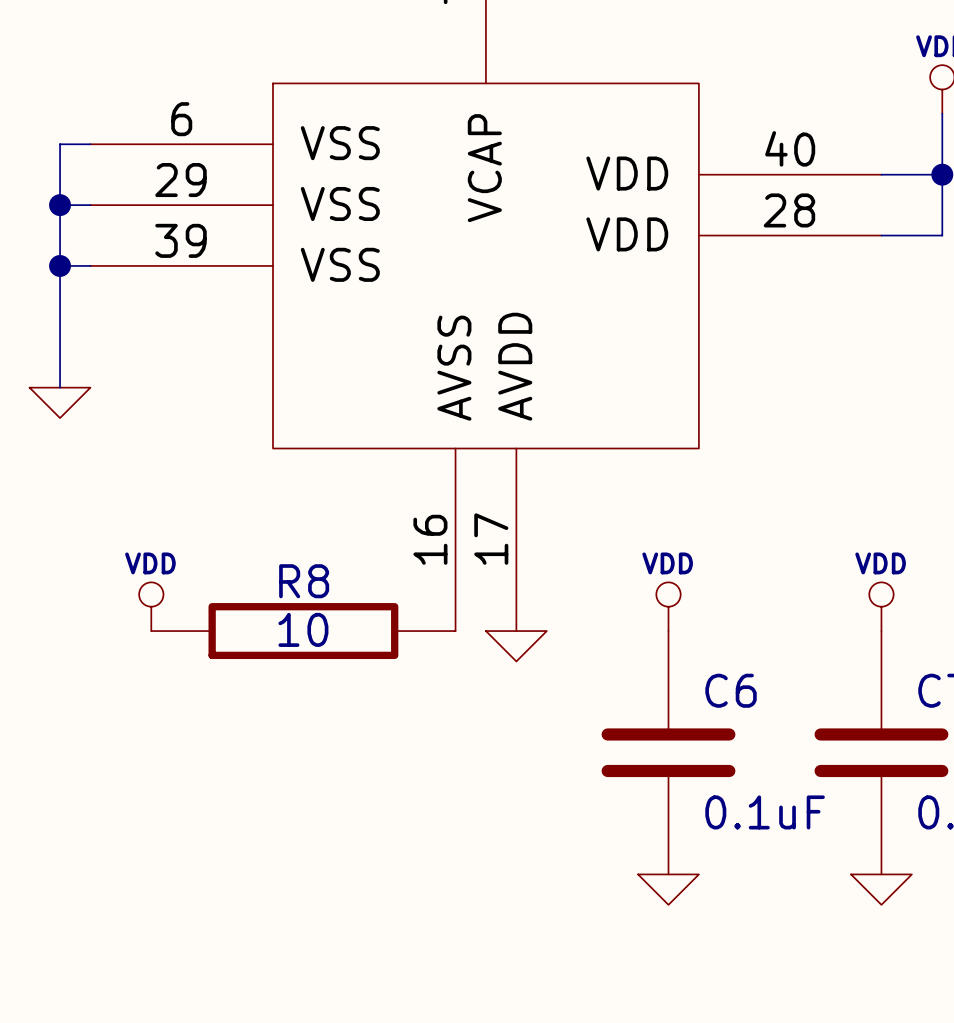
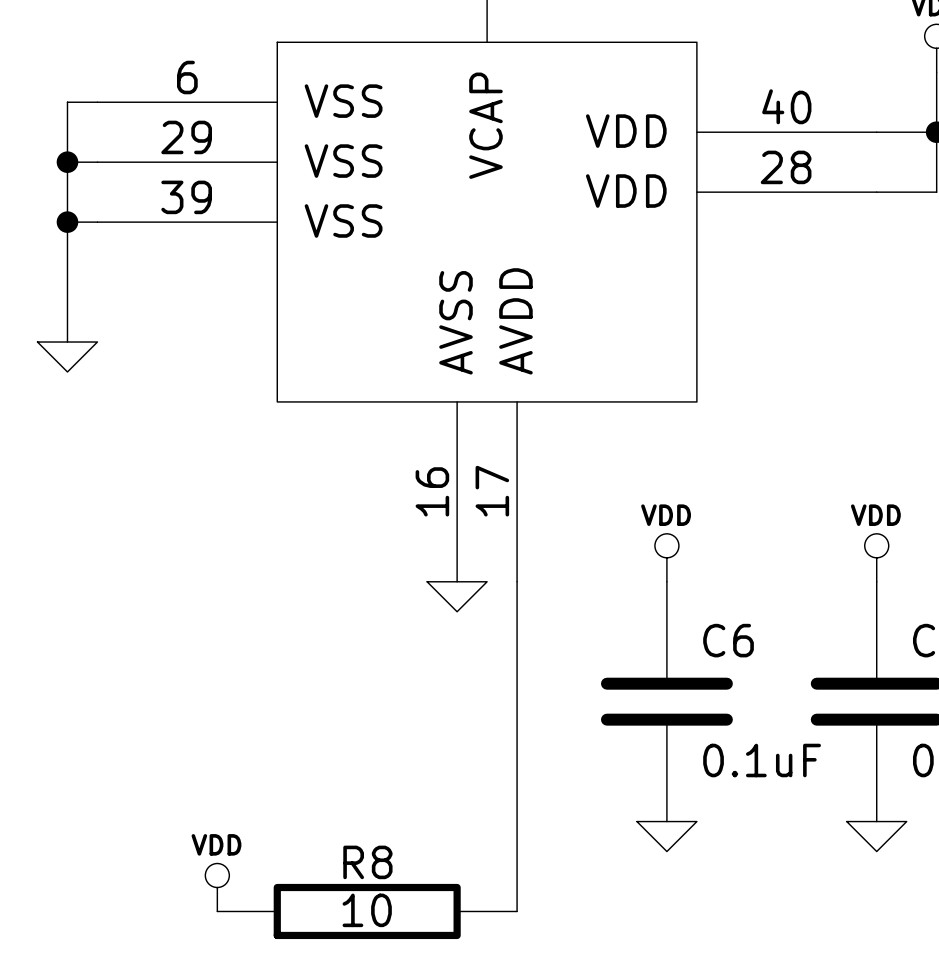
power symbol position: VDD (151, 606) -> VDD (217, 887)
R8 position: (303, 631) -> (367, 911)
wire: none -> (517, 581) (517, 911)
power symbol position: (516, 646) -> (457, 596)

